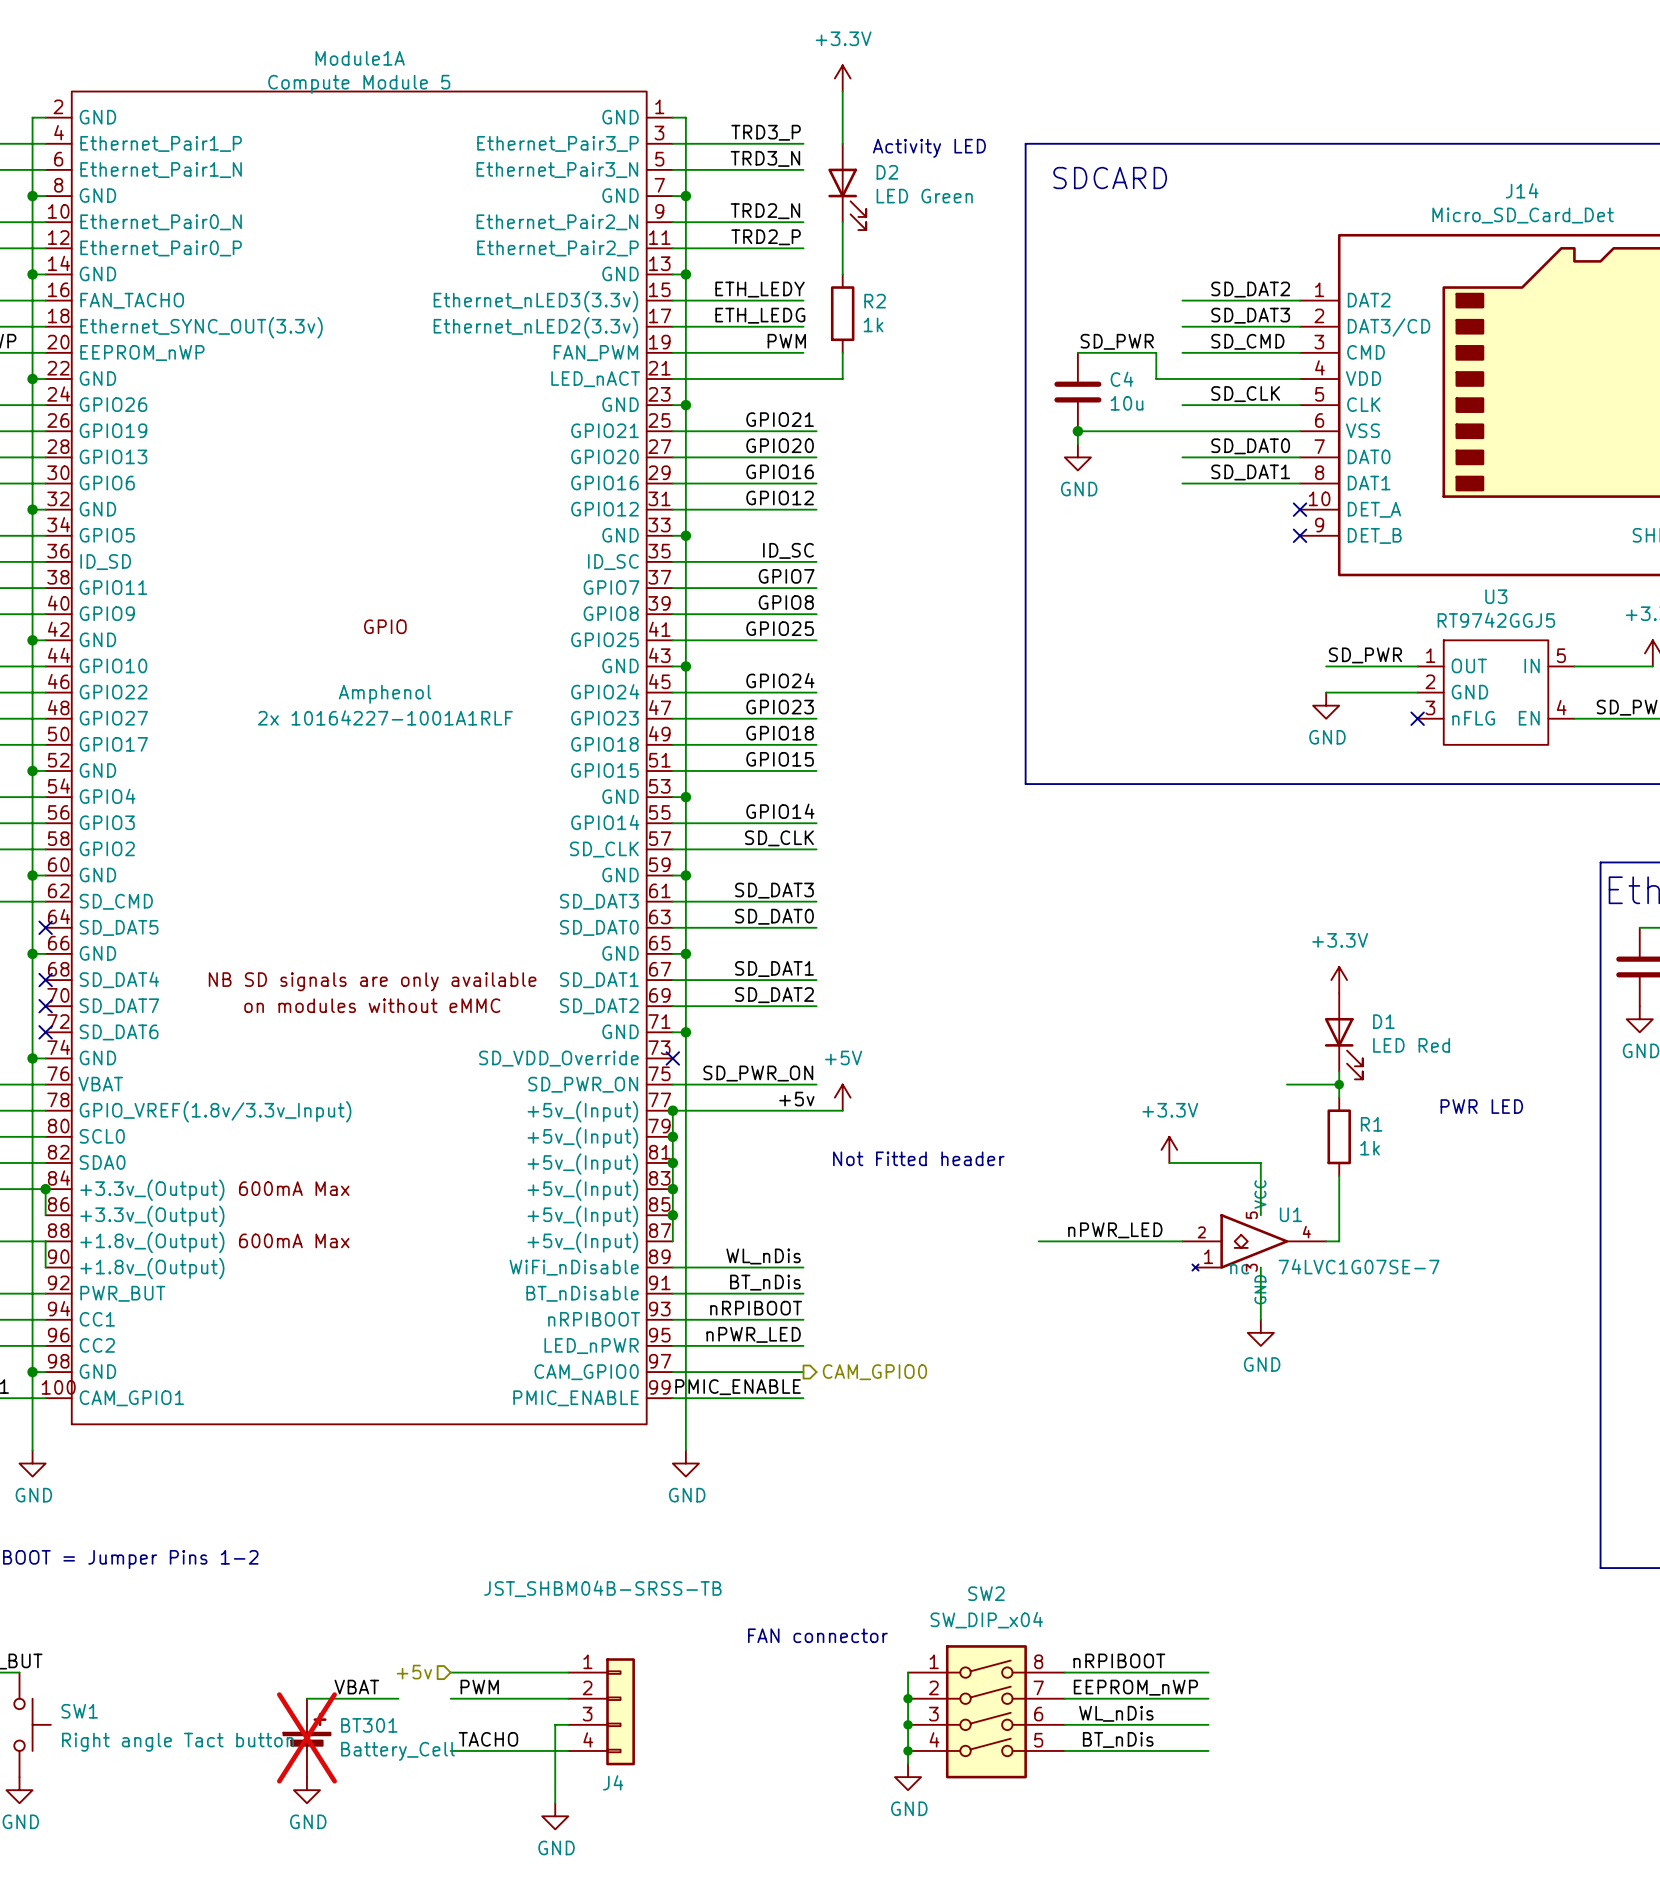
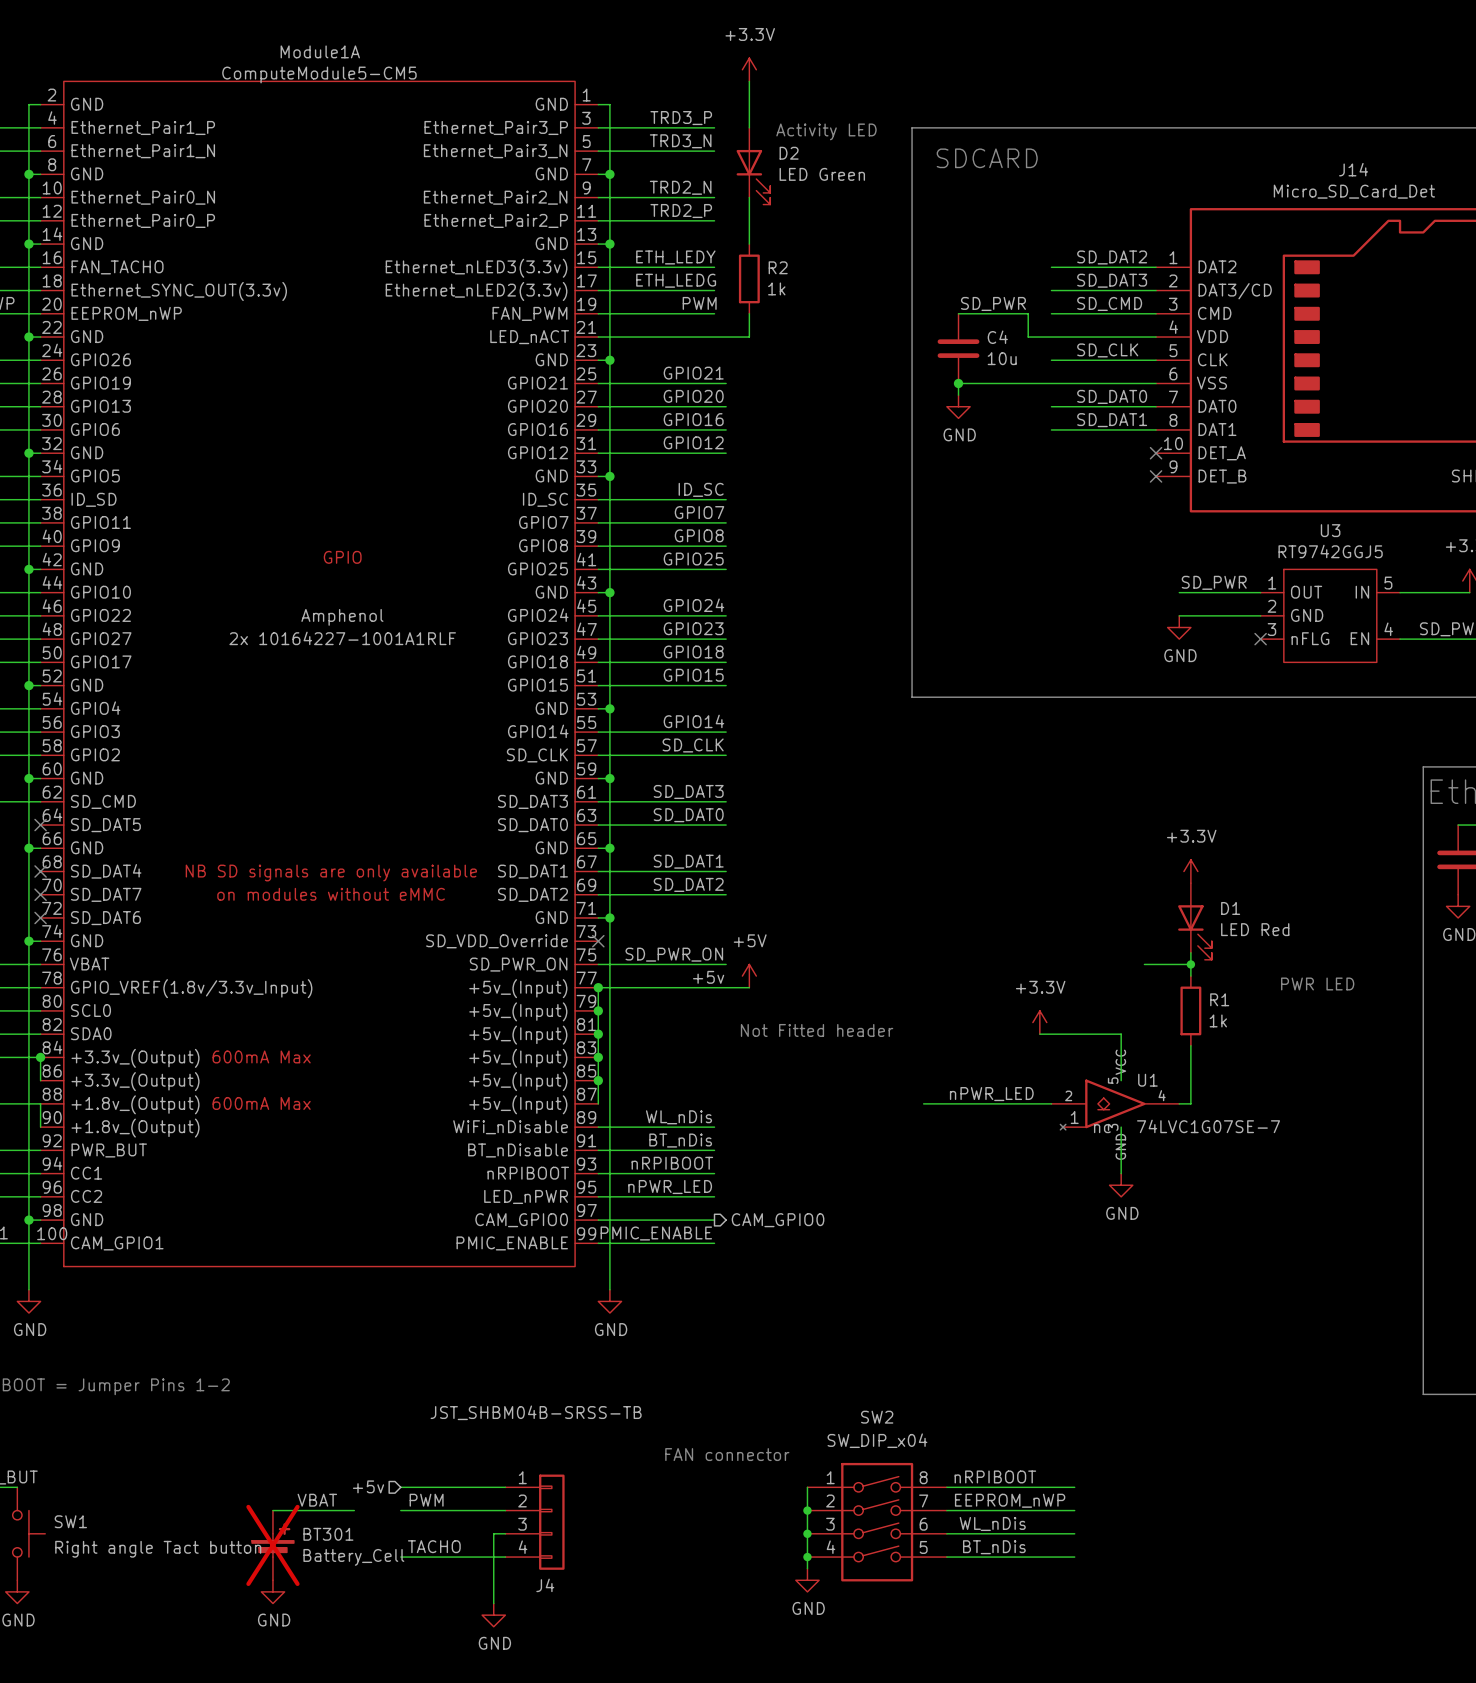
Module1A value: Compute Module 5 (359, 84) -> ComputeModule5-CM5 (319, 74)

